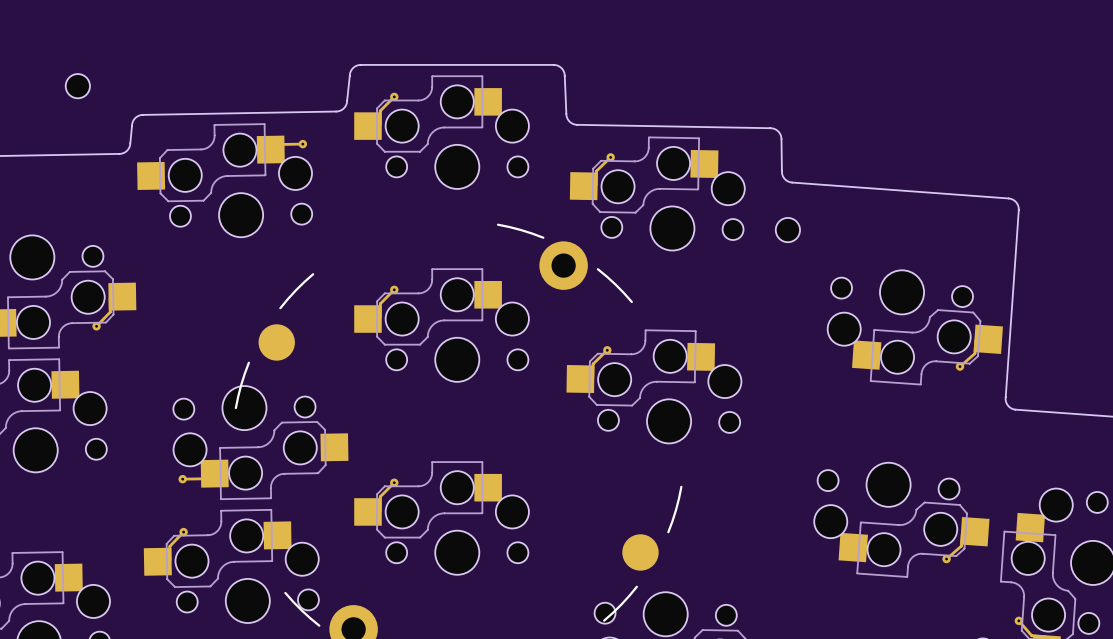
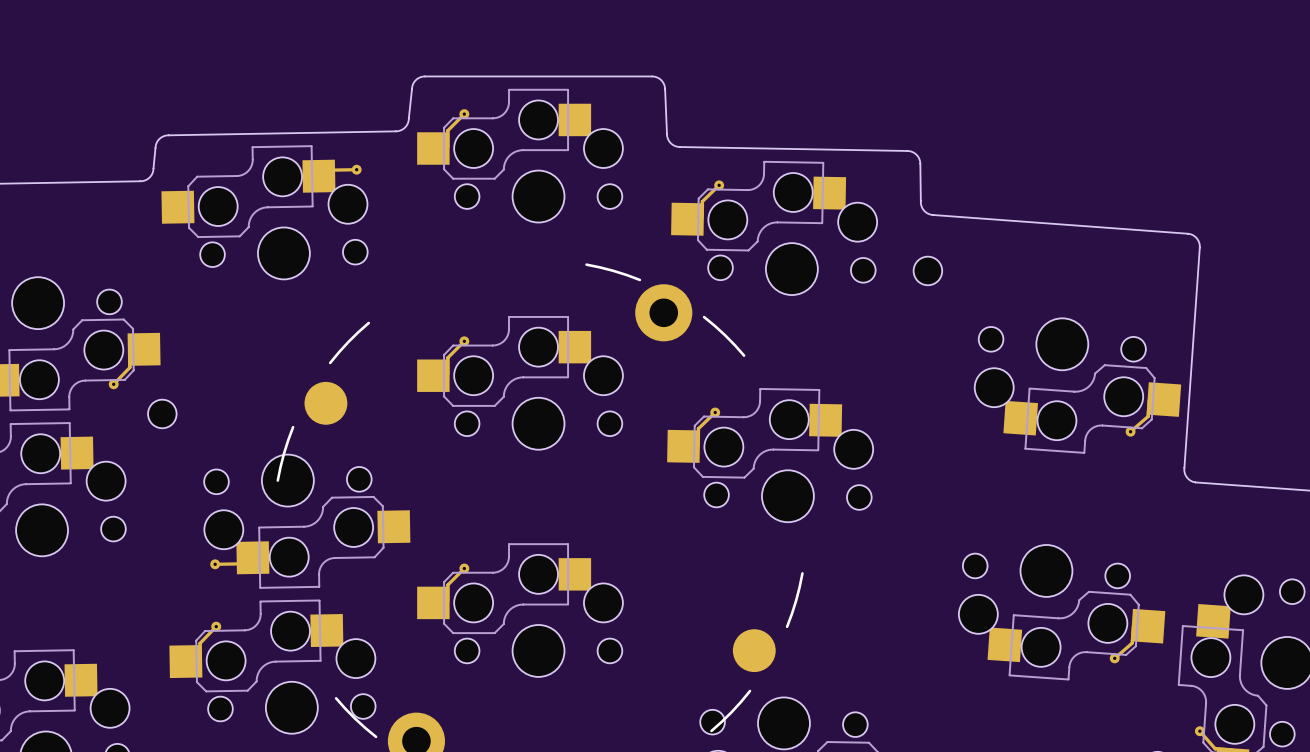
part position: (77, 86) -> (162, 413)

